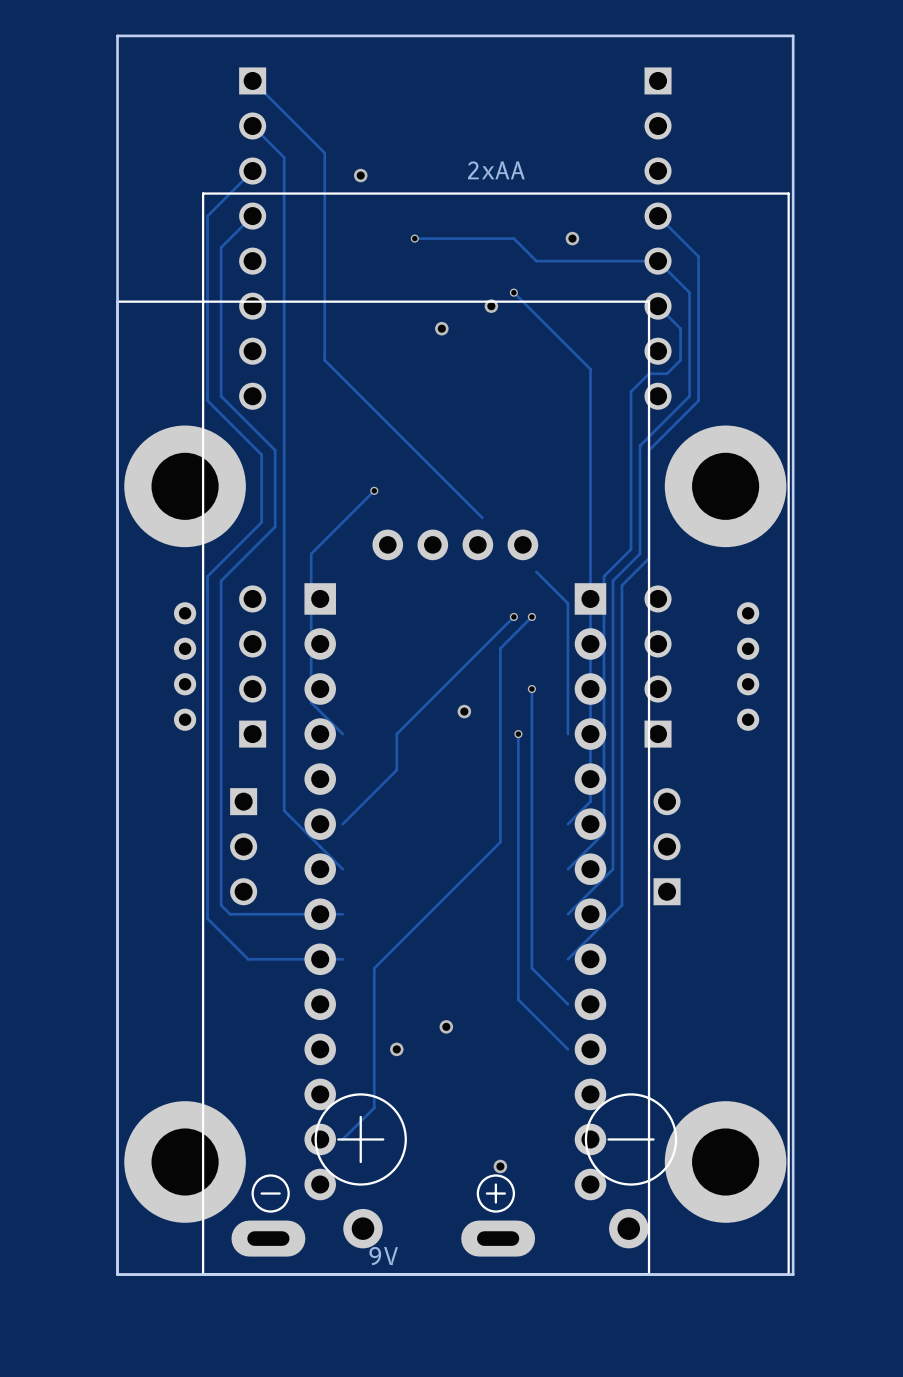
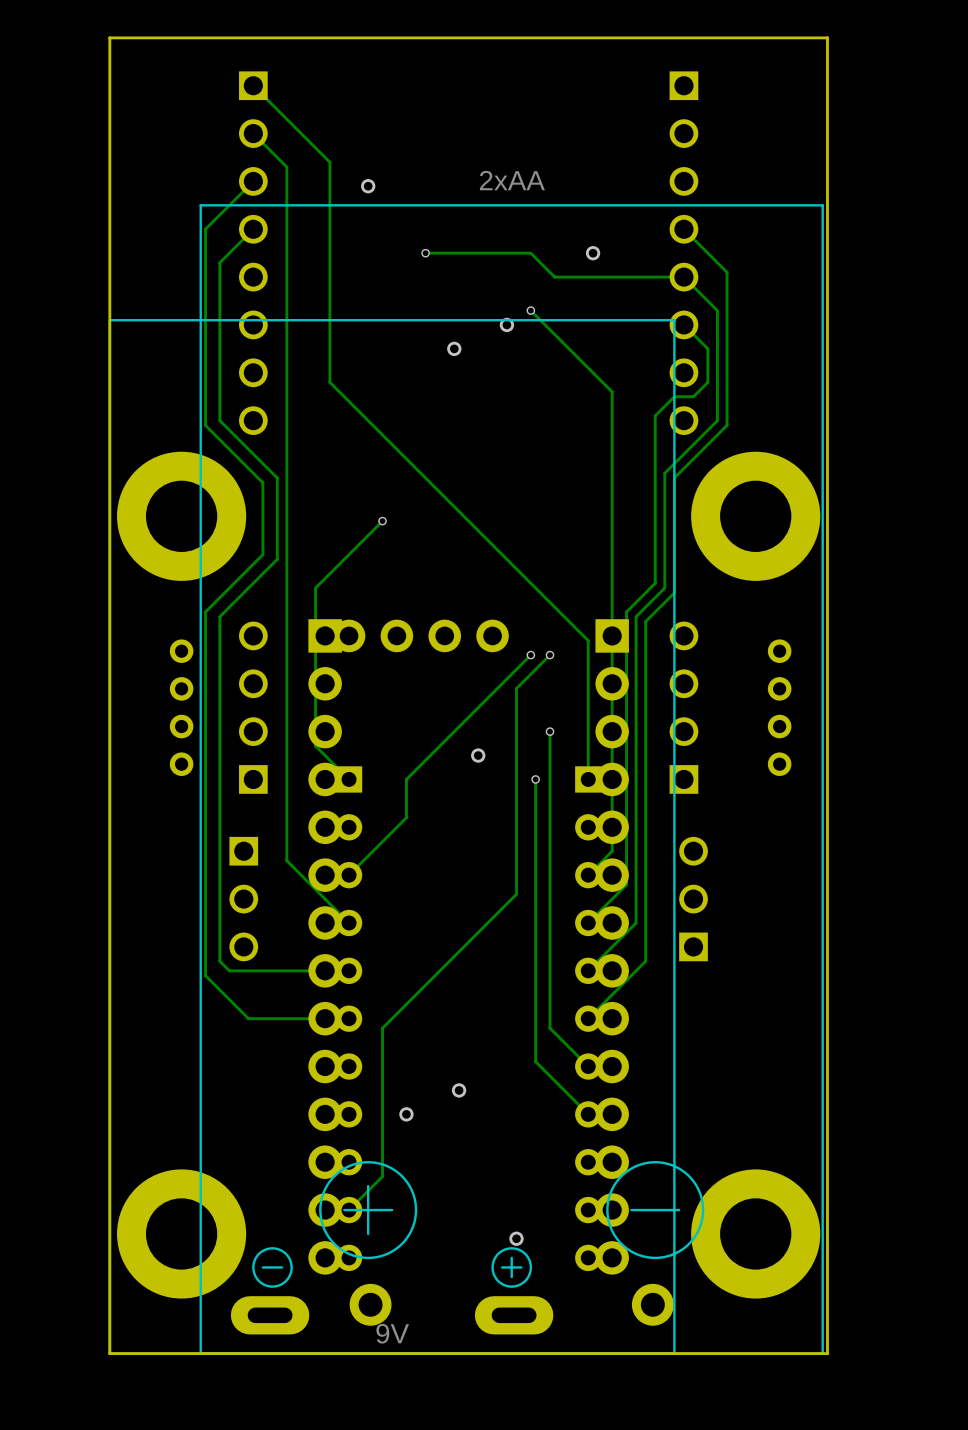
track: none -> (497, 549) (554, 607)
part position: (455, 544) -> (420, 635)
part: none -> (349, 1018)
part: none -> (588, 1018)

